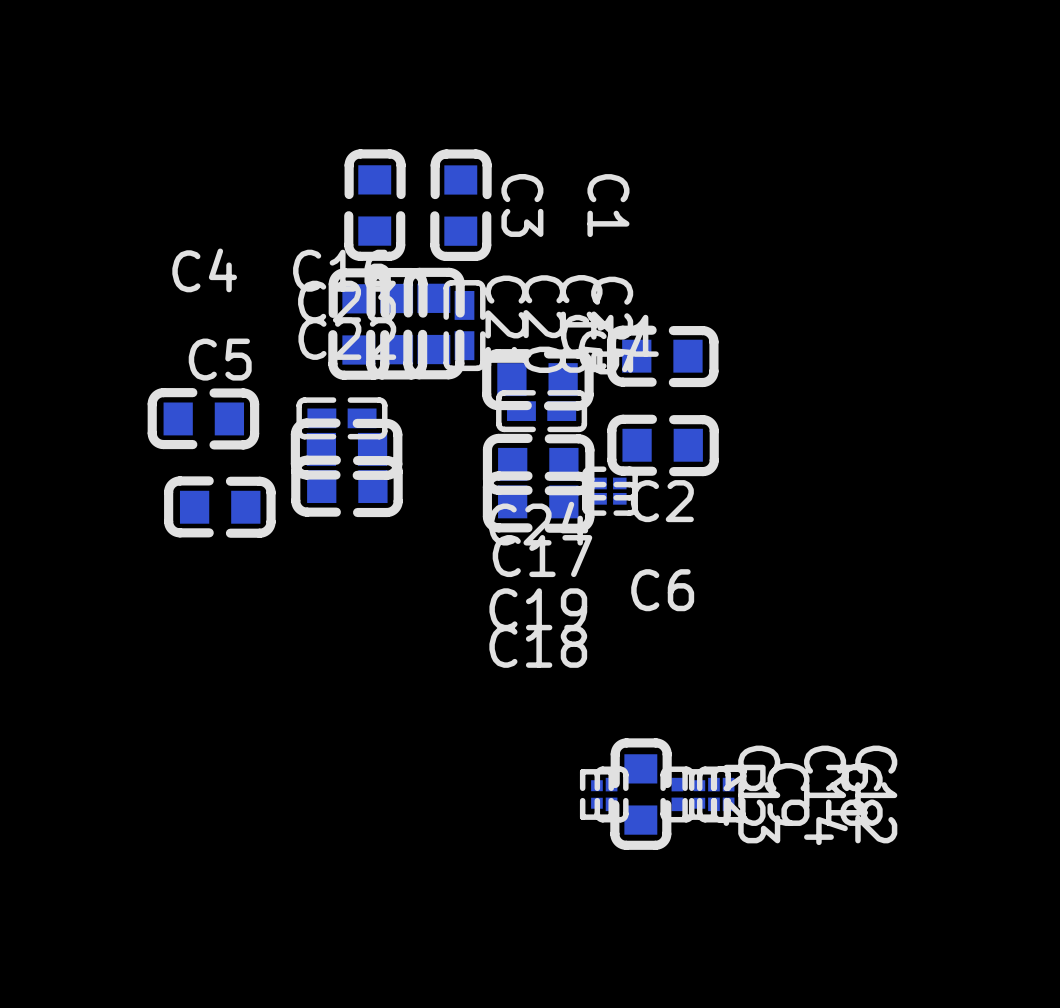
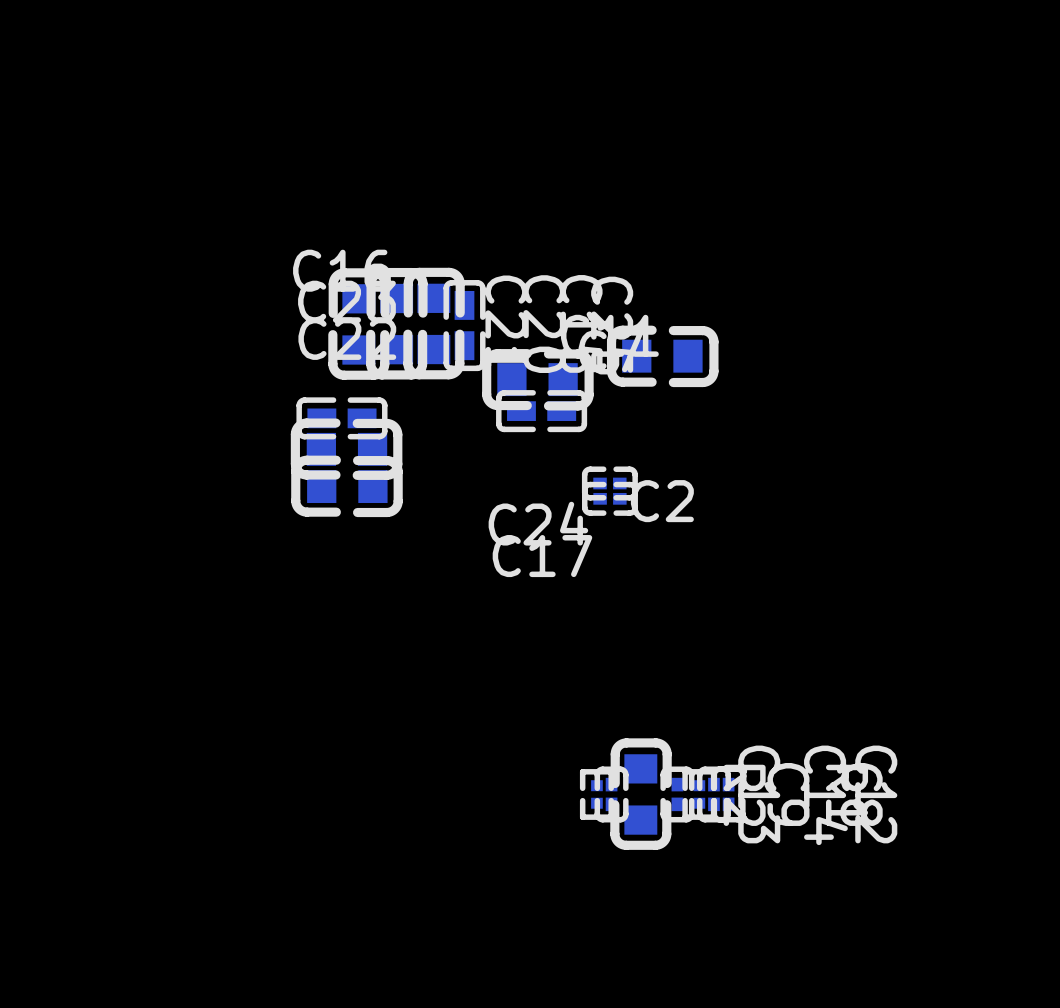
C3: (374, 205) -> none
C1: (460, 205) -> none
C4: (203, 418) -> none
C6: (663, 445) -> none
C19: (538, 464) -> none
C18: (538, 502) -> none
C5: (219, 507) -> none

